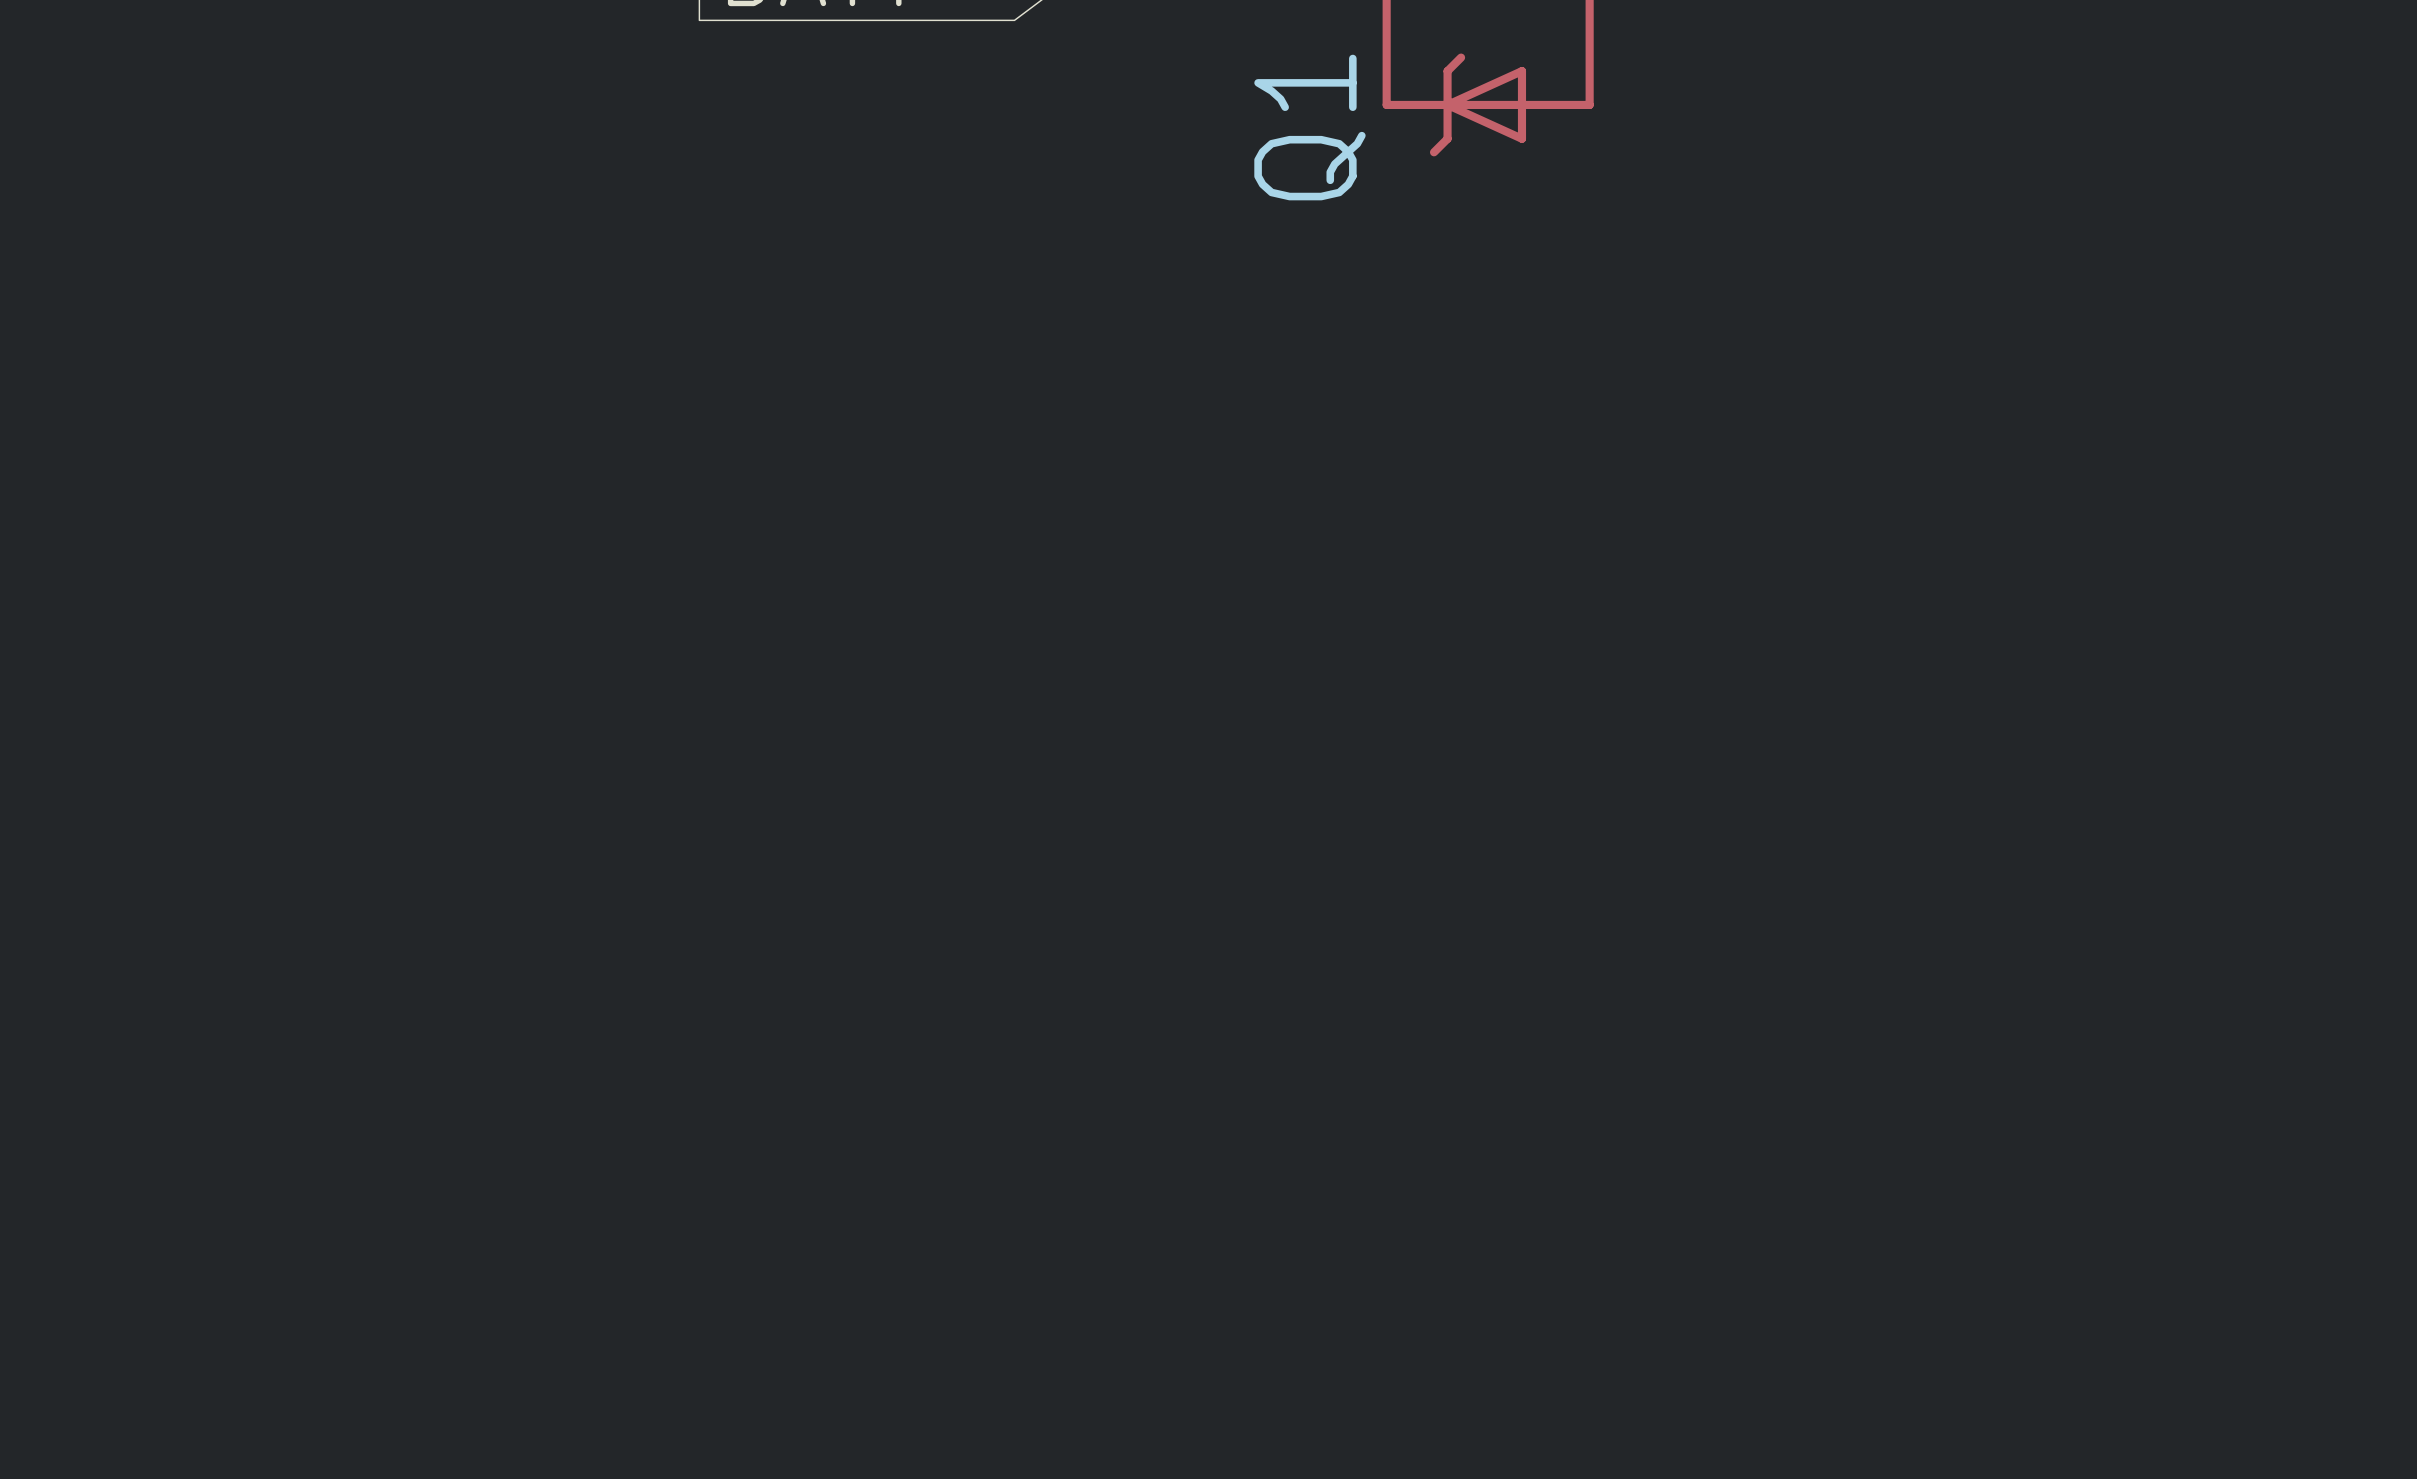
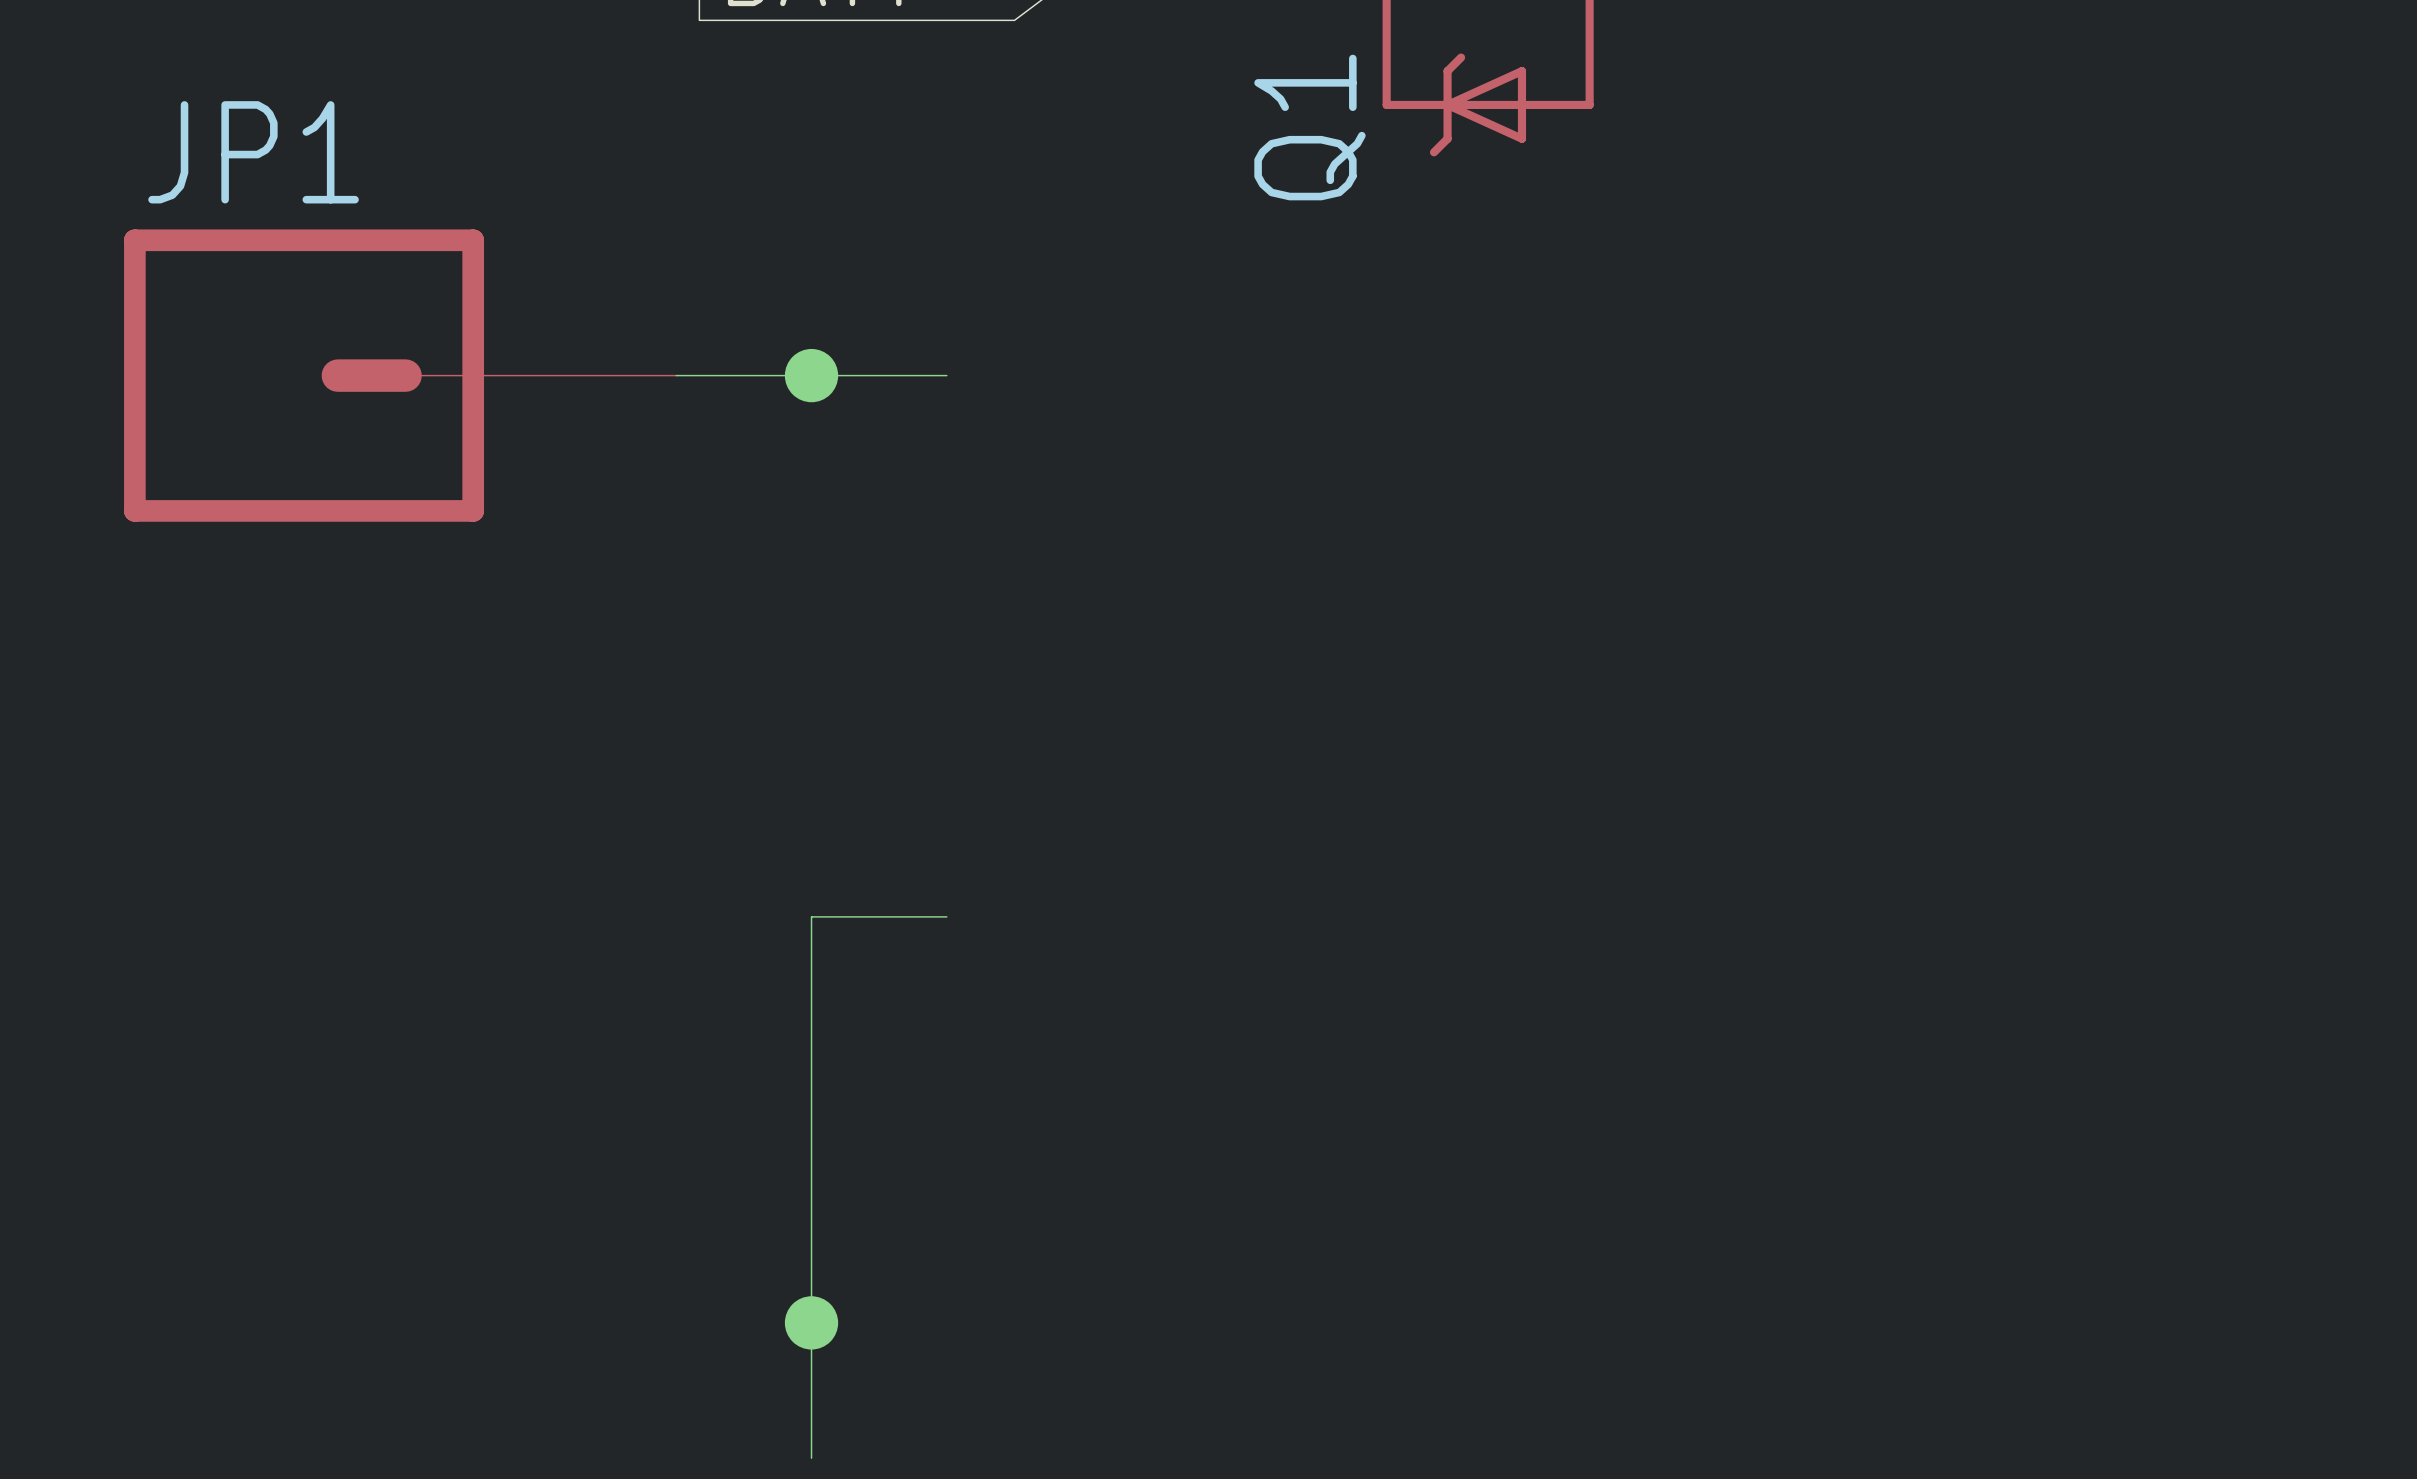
JP1: none -> (400, 375)
wire: none -> (676, 375) (946, 375)
junction: none -> (811, 375)
wire: none -> (946, 916) (811, 916) (811, 1458)
junction: none -> (811, 1322)

